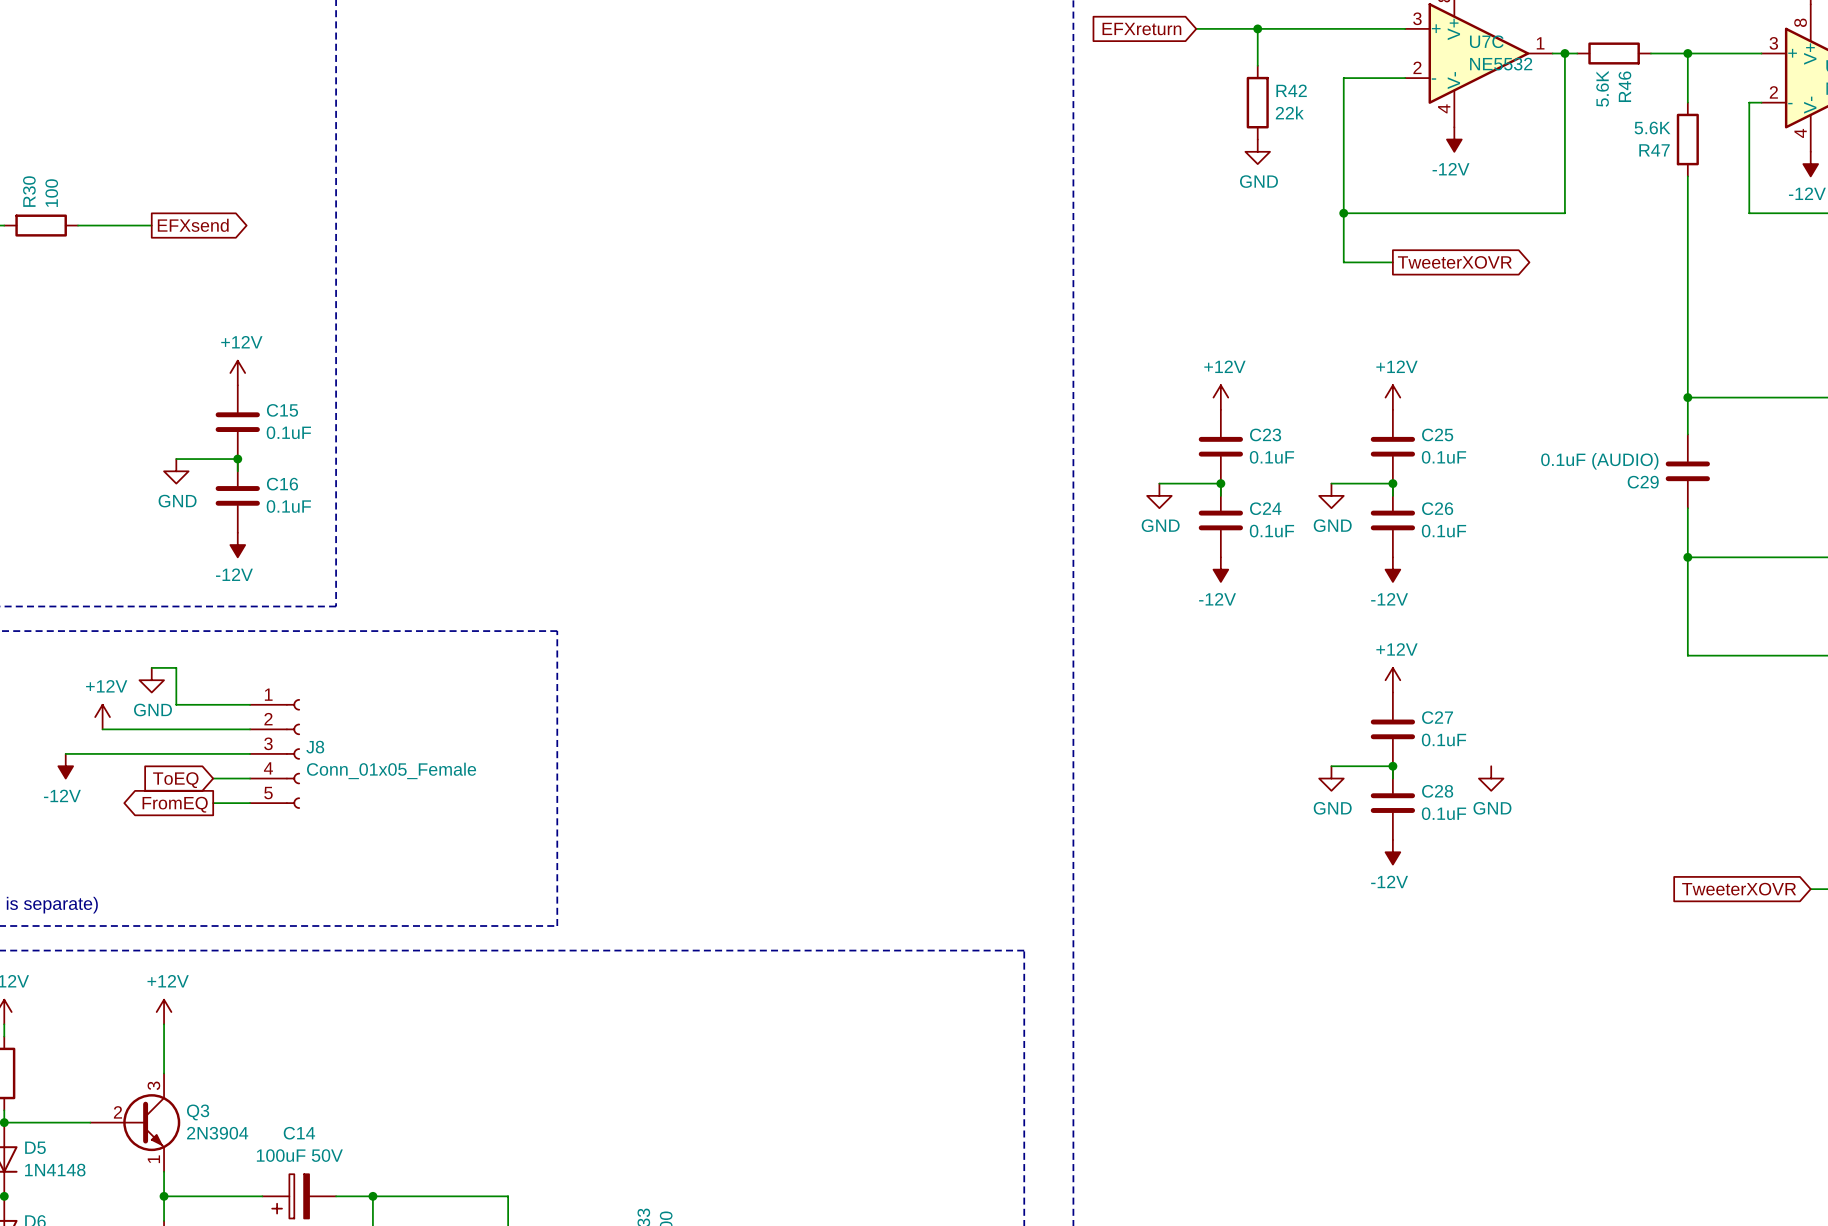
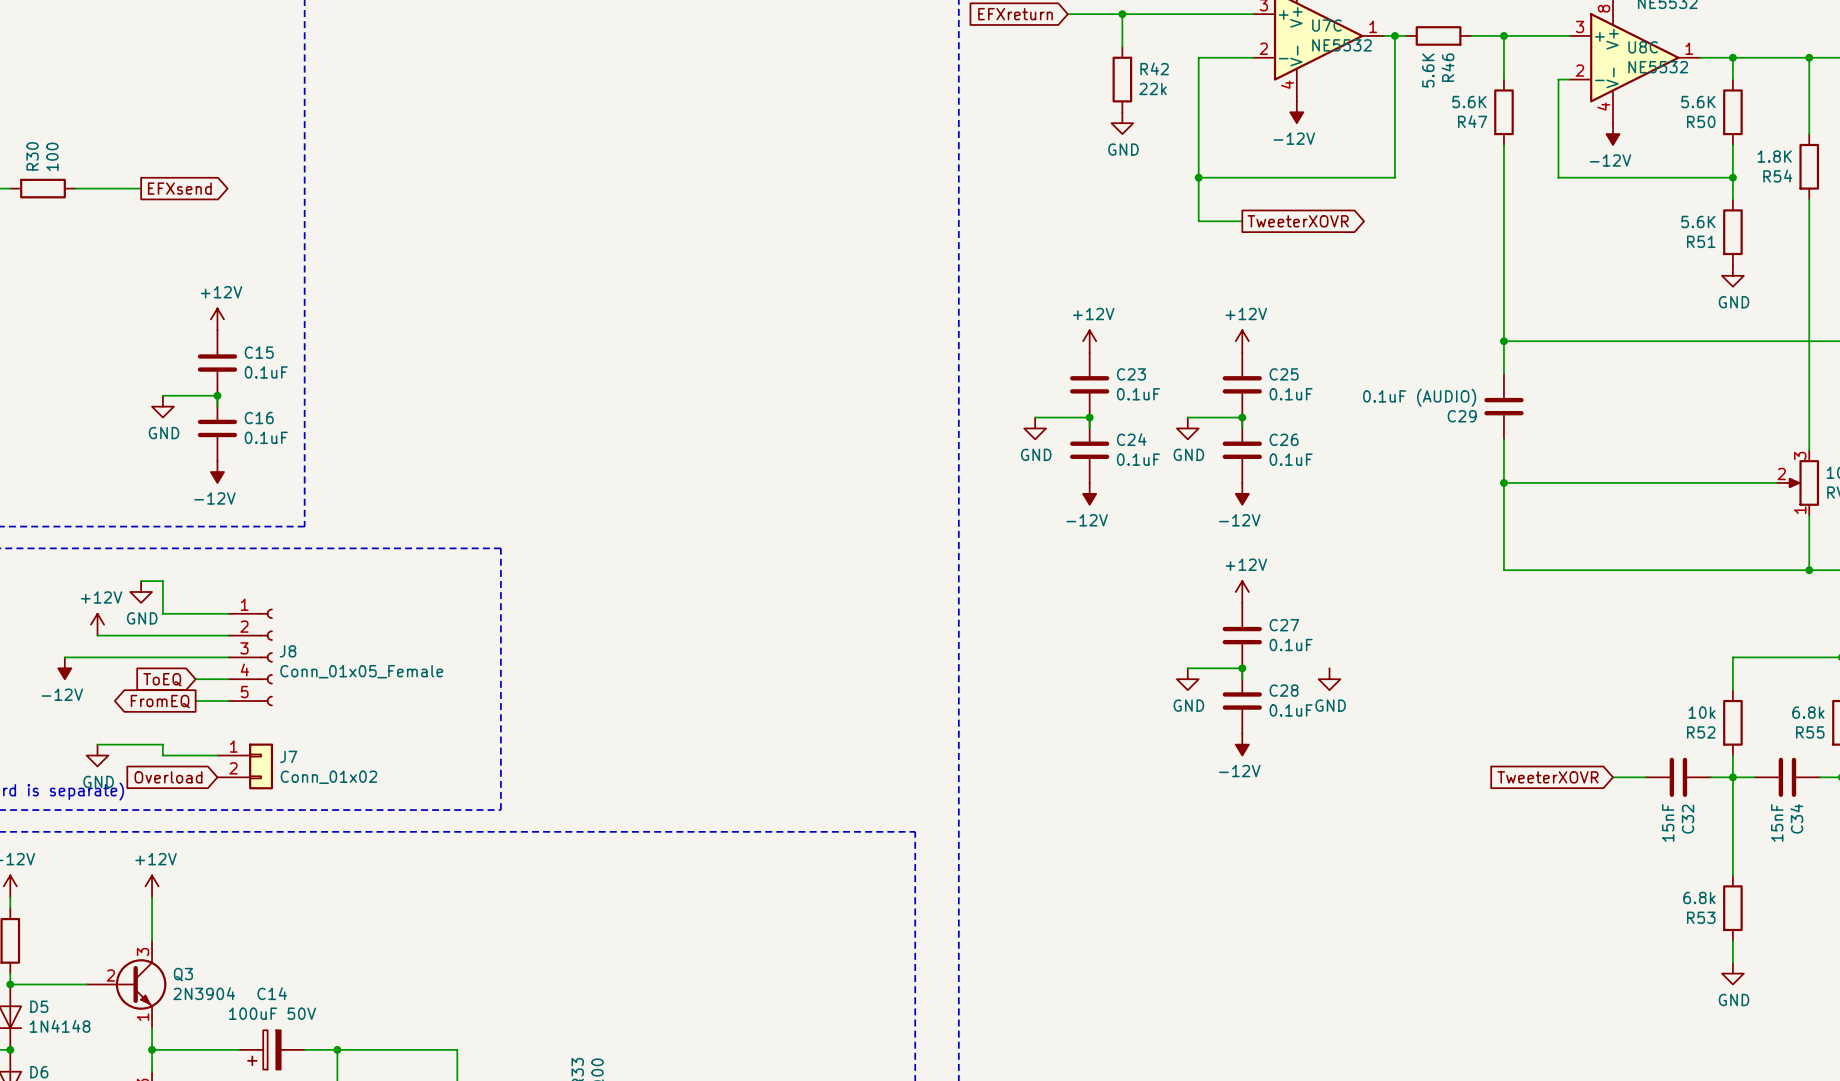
wire: none -> (97, 744) (162, 744) (162, 755) (217, 755)
power symbol: none -> GND (97, 755)
J7: none -> Conn_01x02 (245, 766)
global label: none -> Overload (168, 777)

